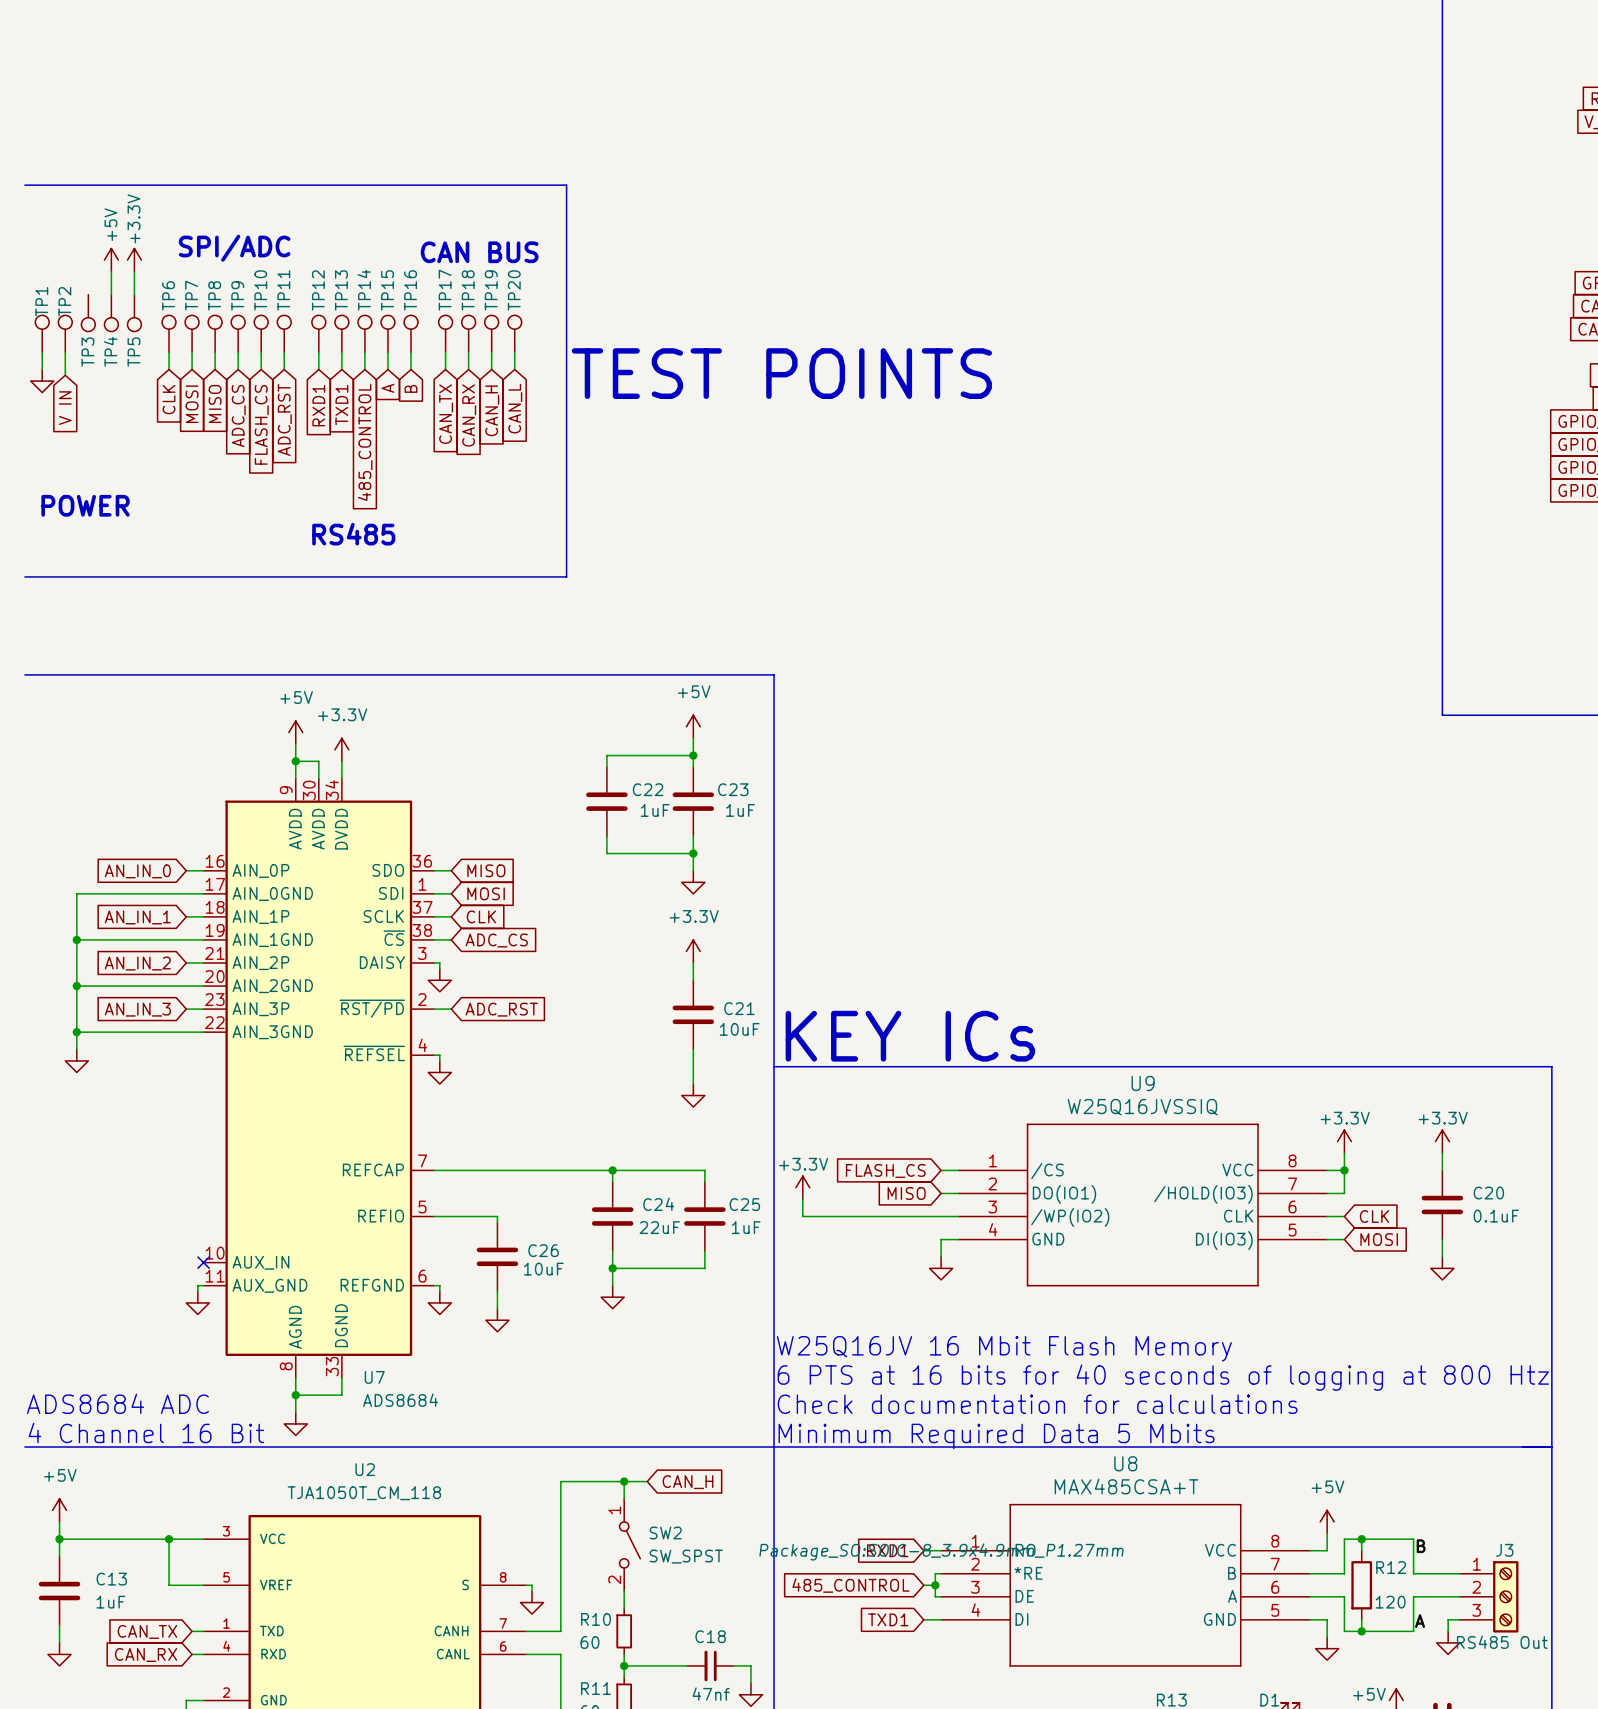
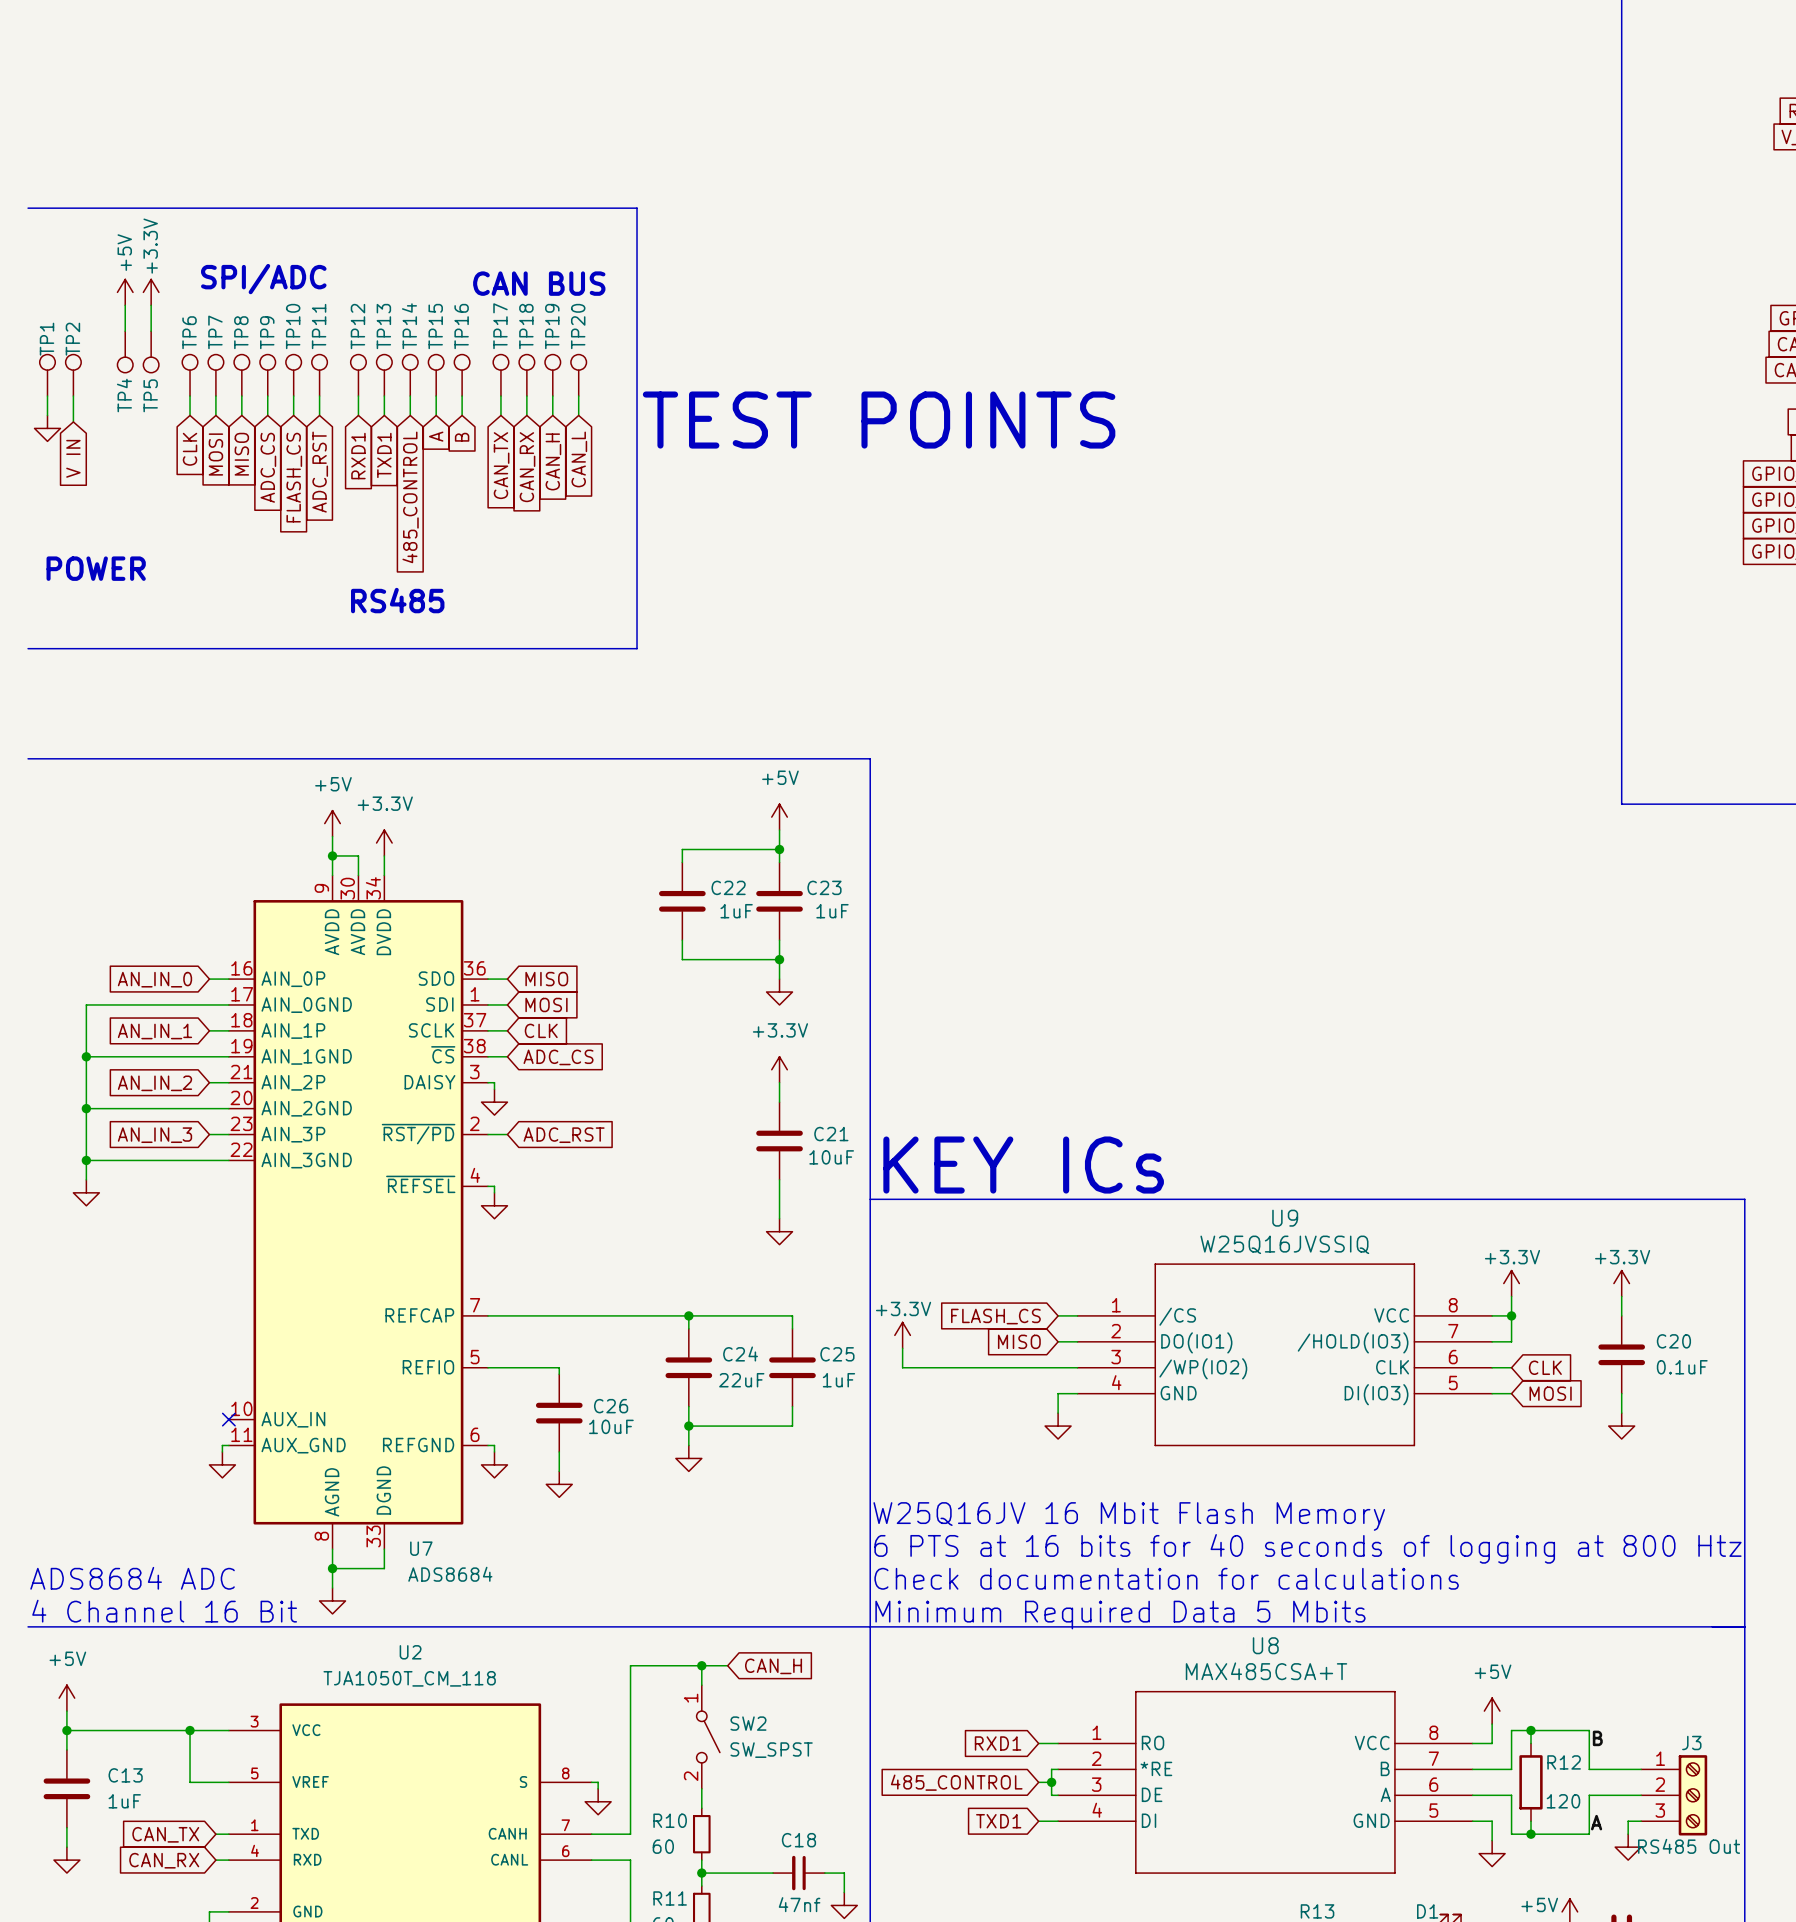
TP3: (88, 313) -> none
U8 text: Package_SO:SOIC-8_3.9x4.9mm_P1.27mm (941, 1551) -> none

